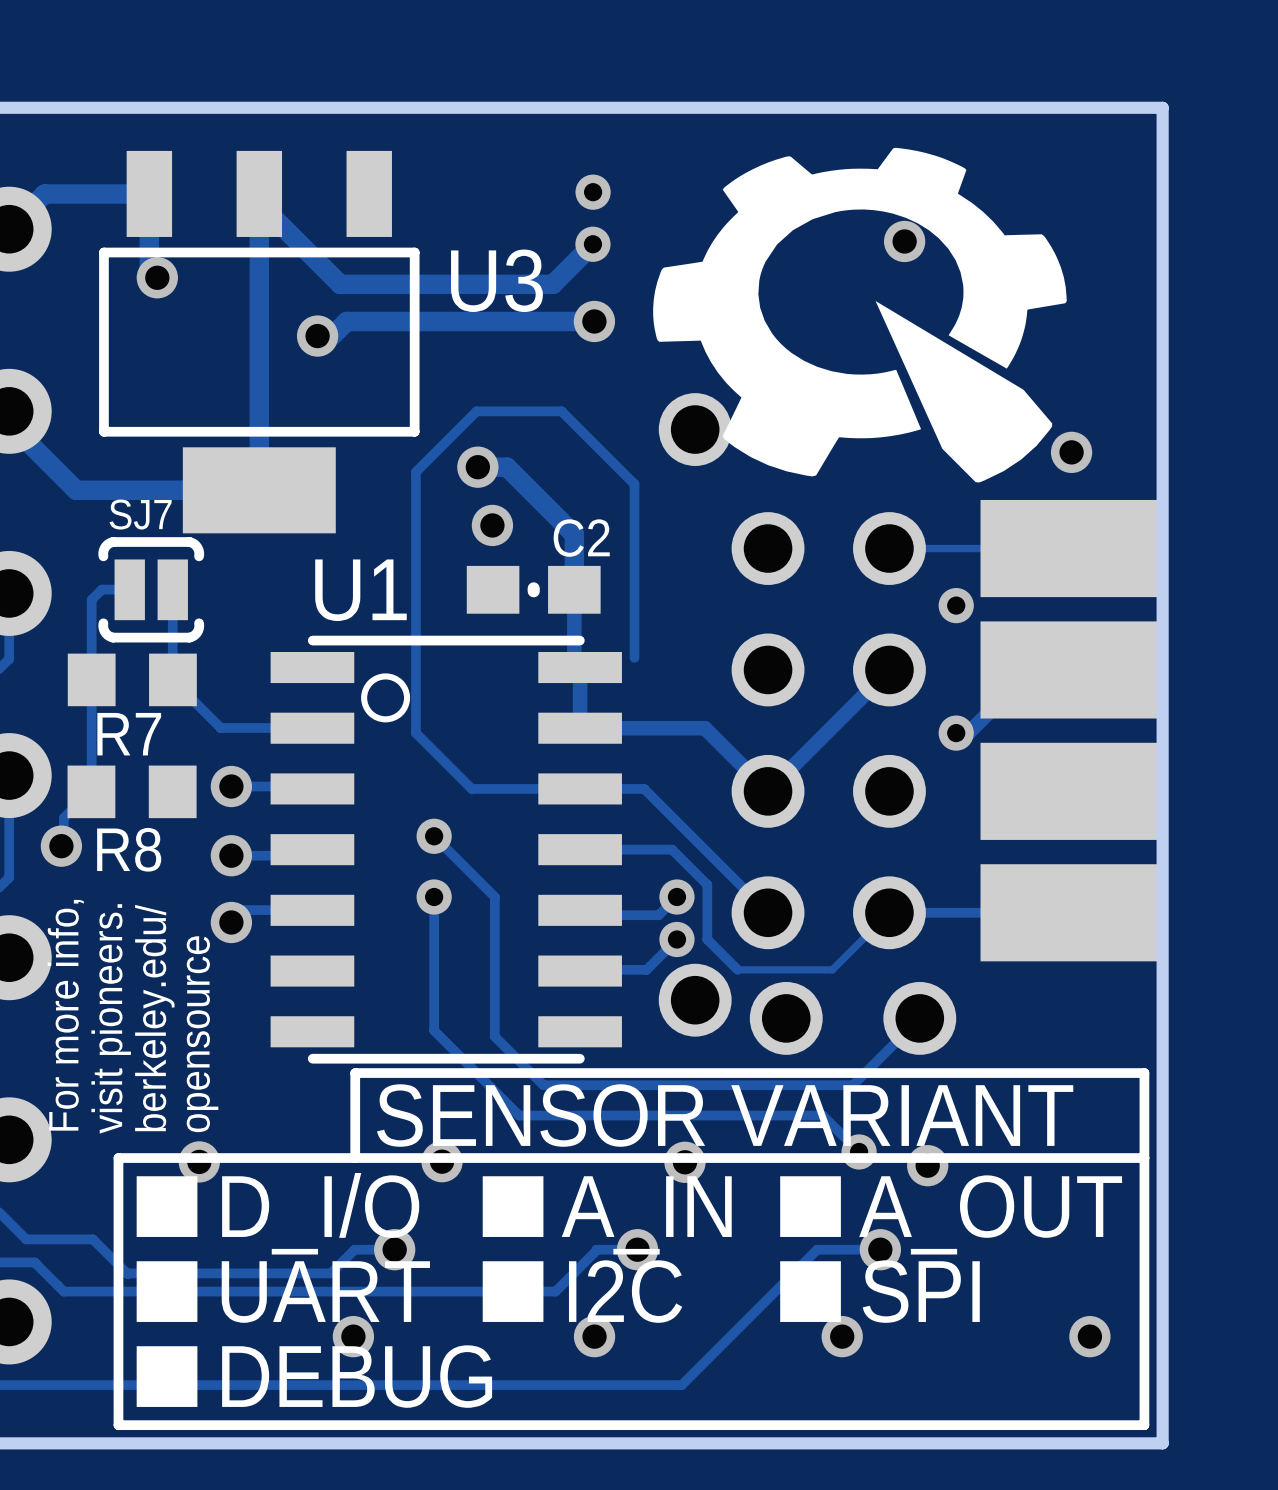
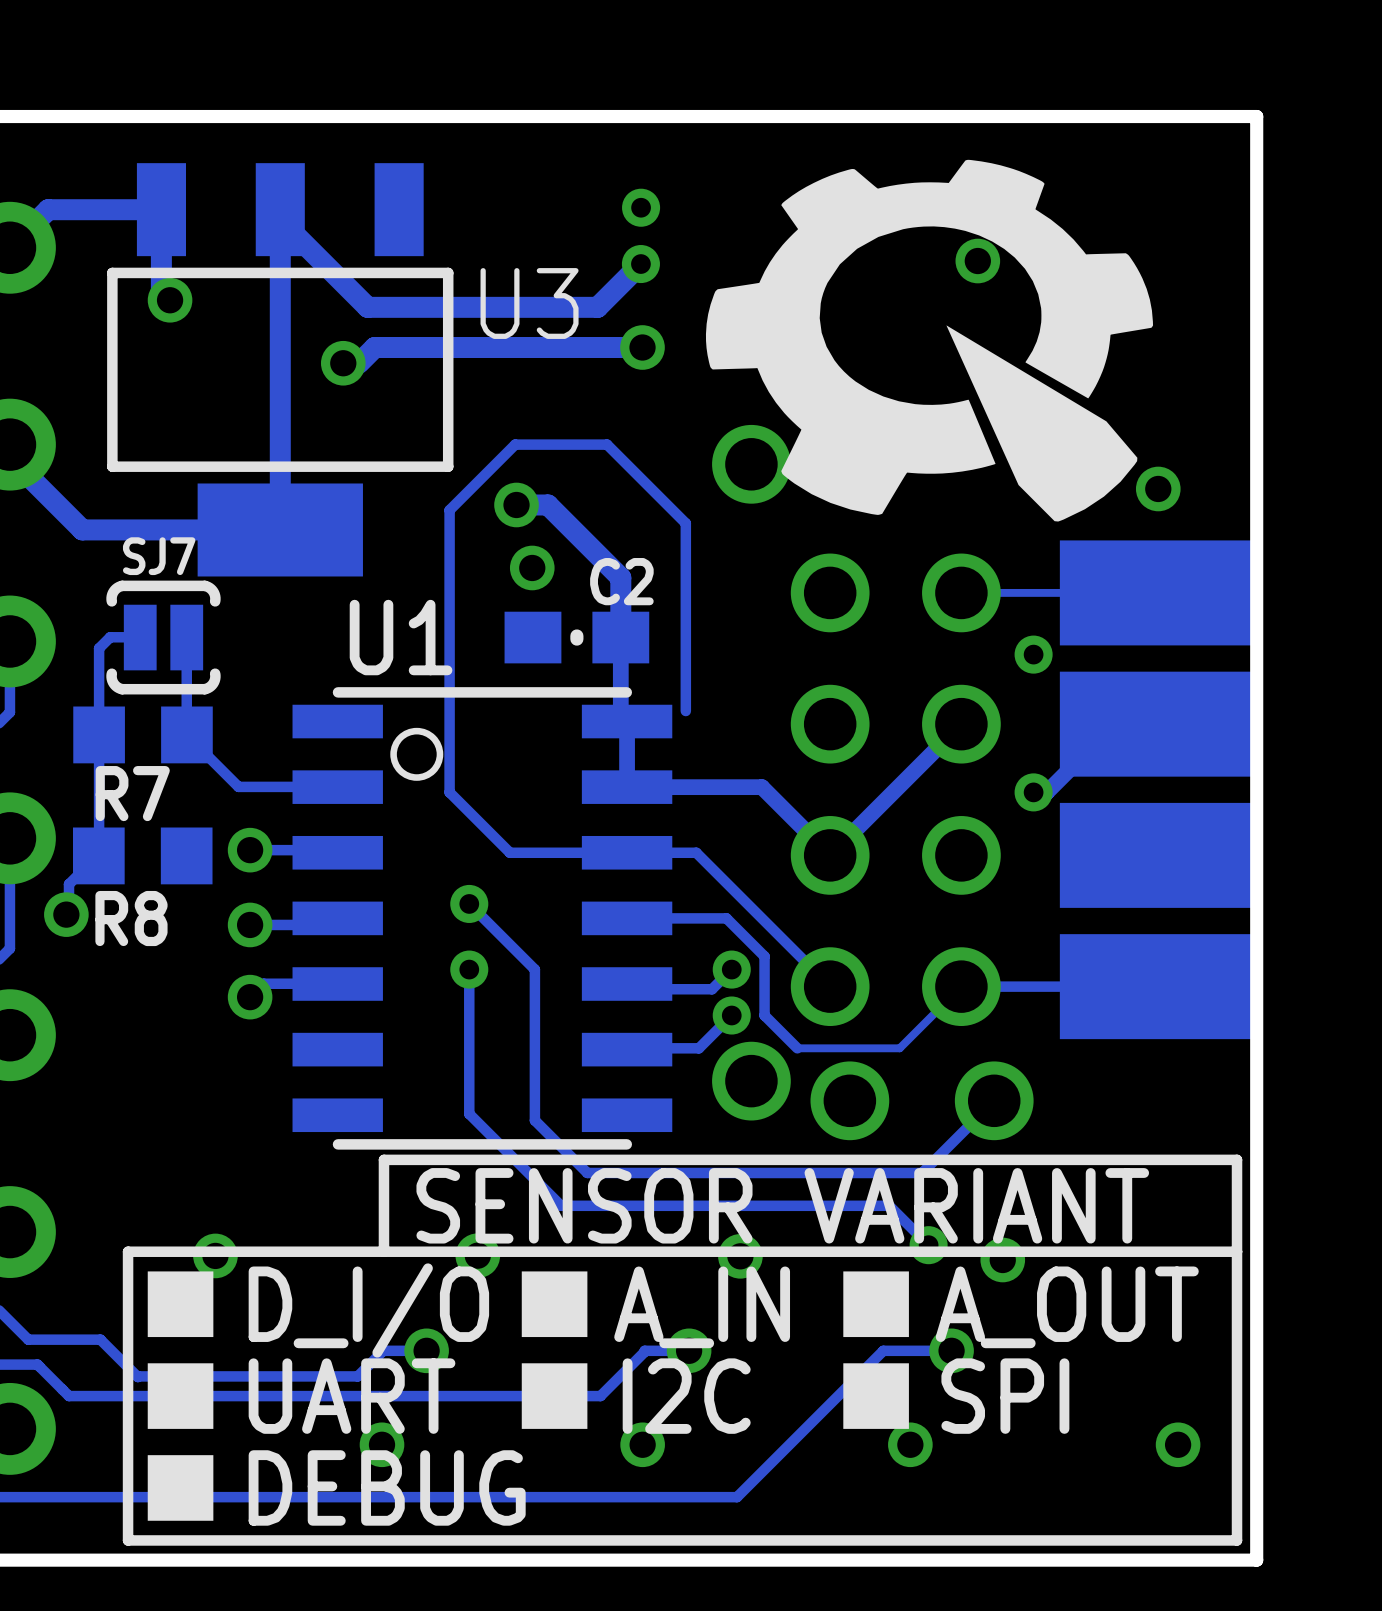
text: For more info, (65, 1015) -> none
text: visit pioneers. (111, 1018) -> none
text: berkeley.edu/ (154, 1018) -> none
text: opensource (202, 1034) -> none

